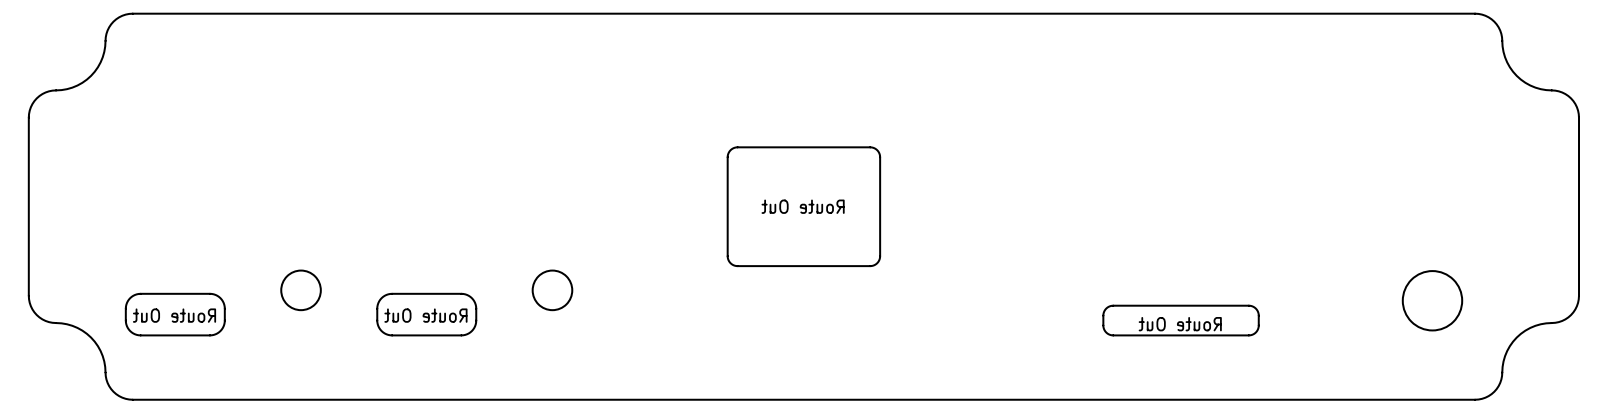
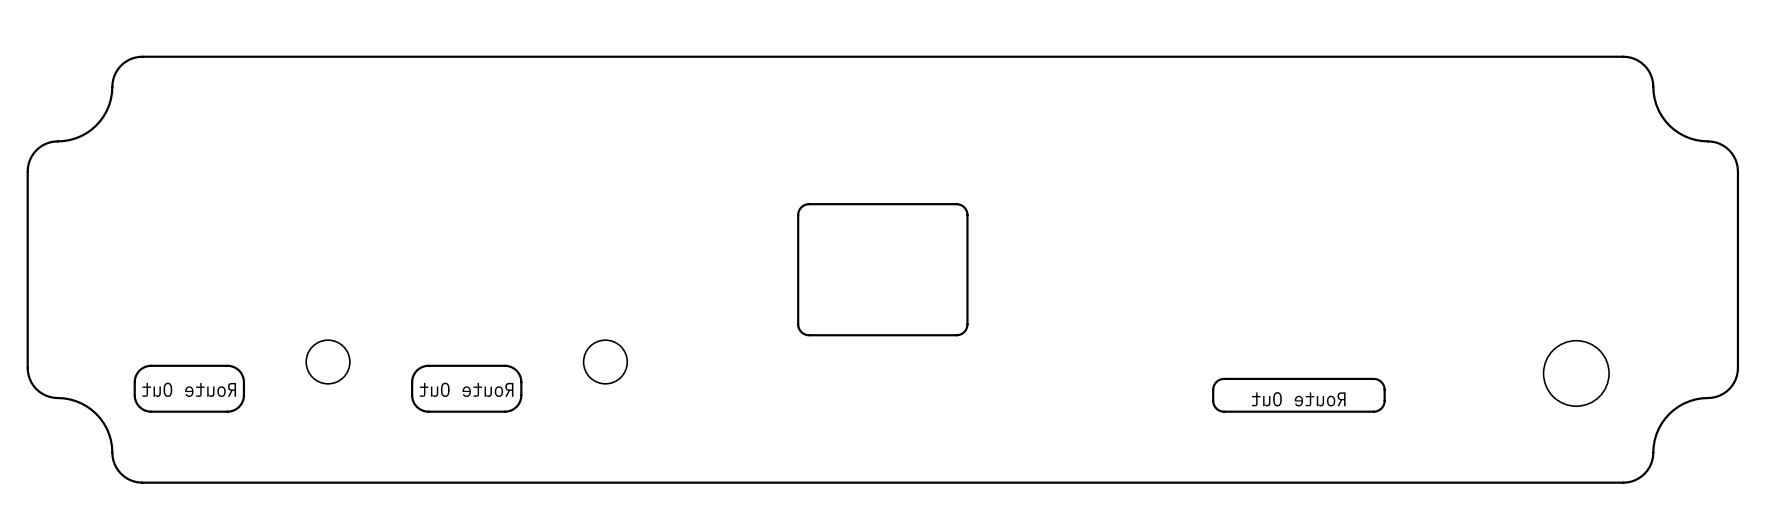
drawing: [726, 146, 882, 268] -> none
board edge: none -> (956, 204) (809, 204) (802, 206) (798, 215) (798, 324) (800, 330) (809, 335) (956, 335) (963, 332) (967, 324) (967, 215) (964, 207) (956, 204)

